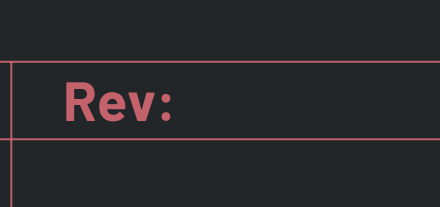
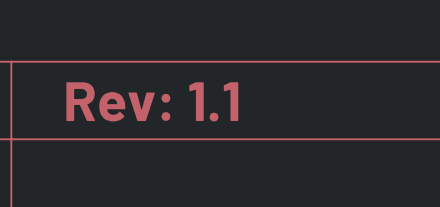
title block: Rev: (118, 101) -> Rev: 1.1 (152, 101)

